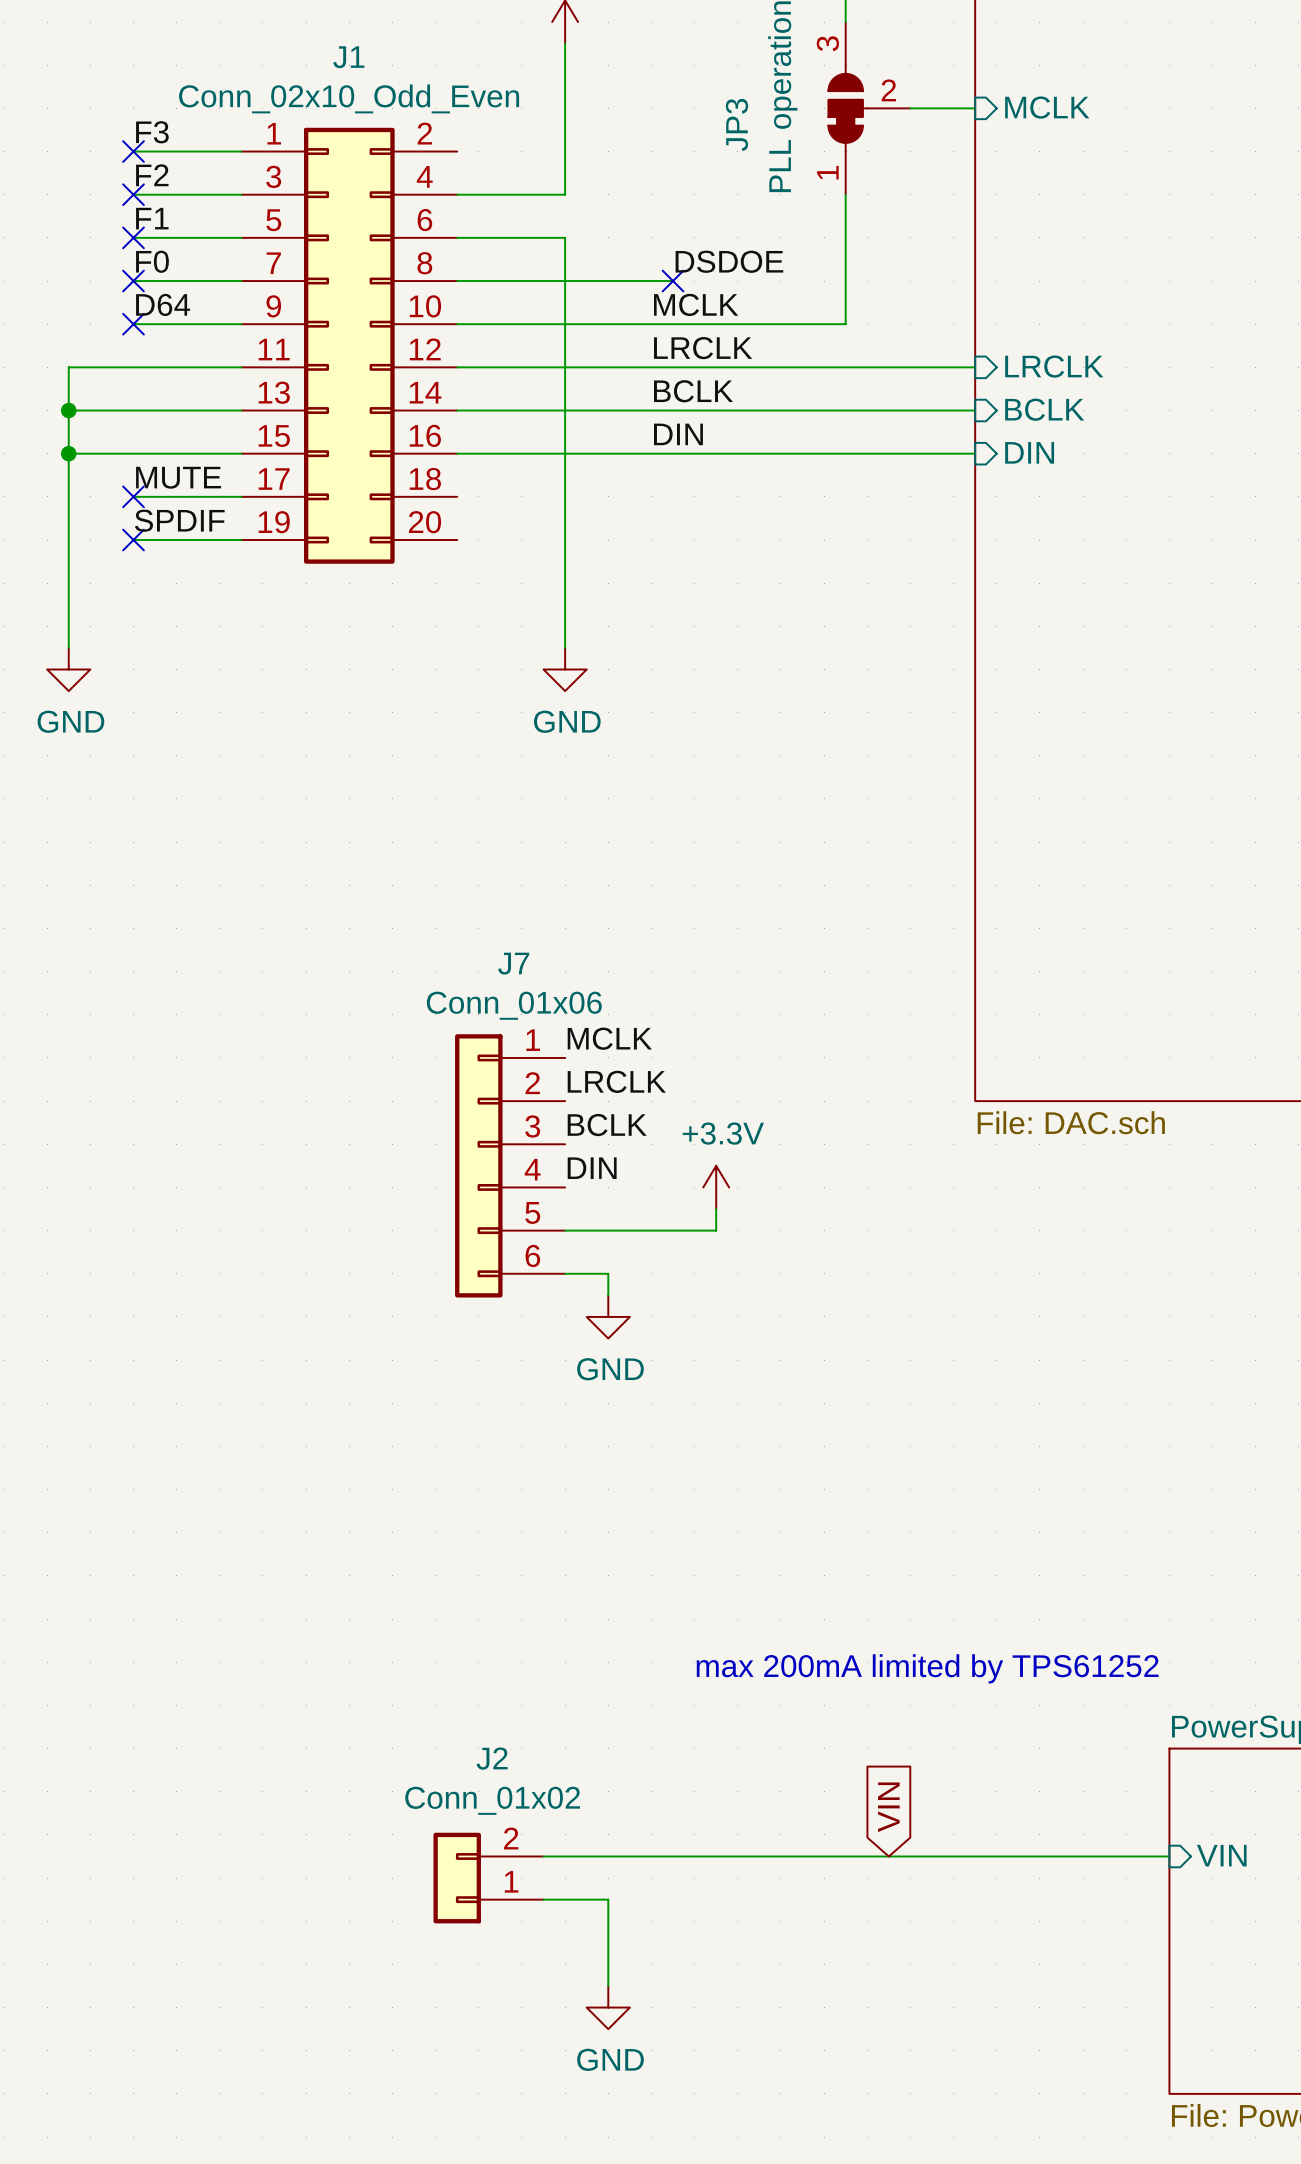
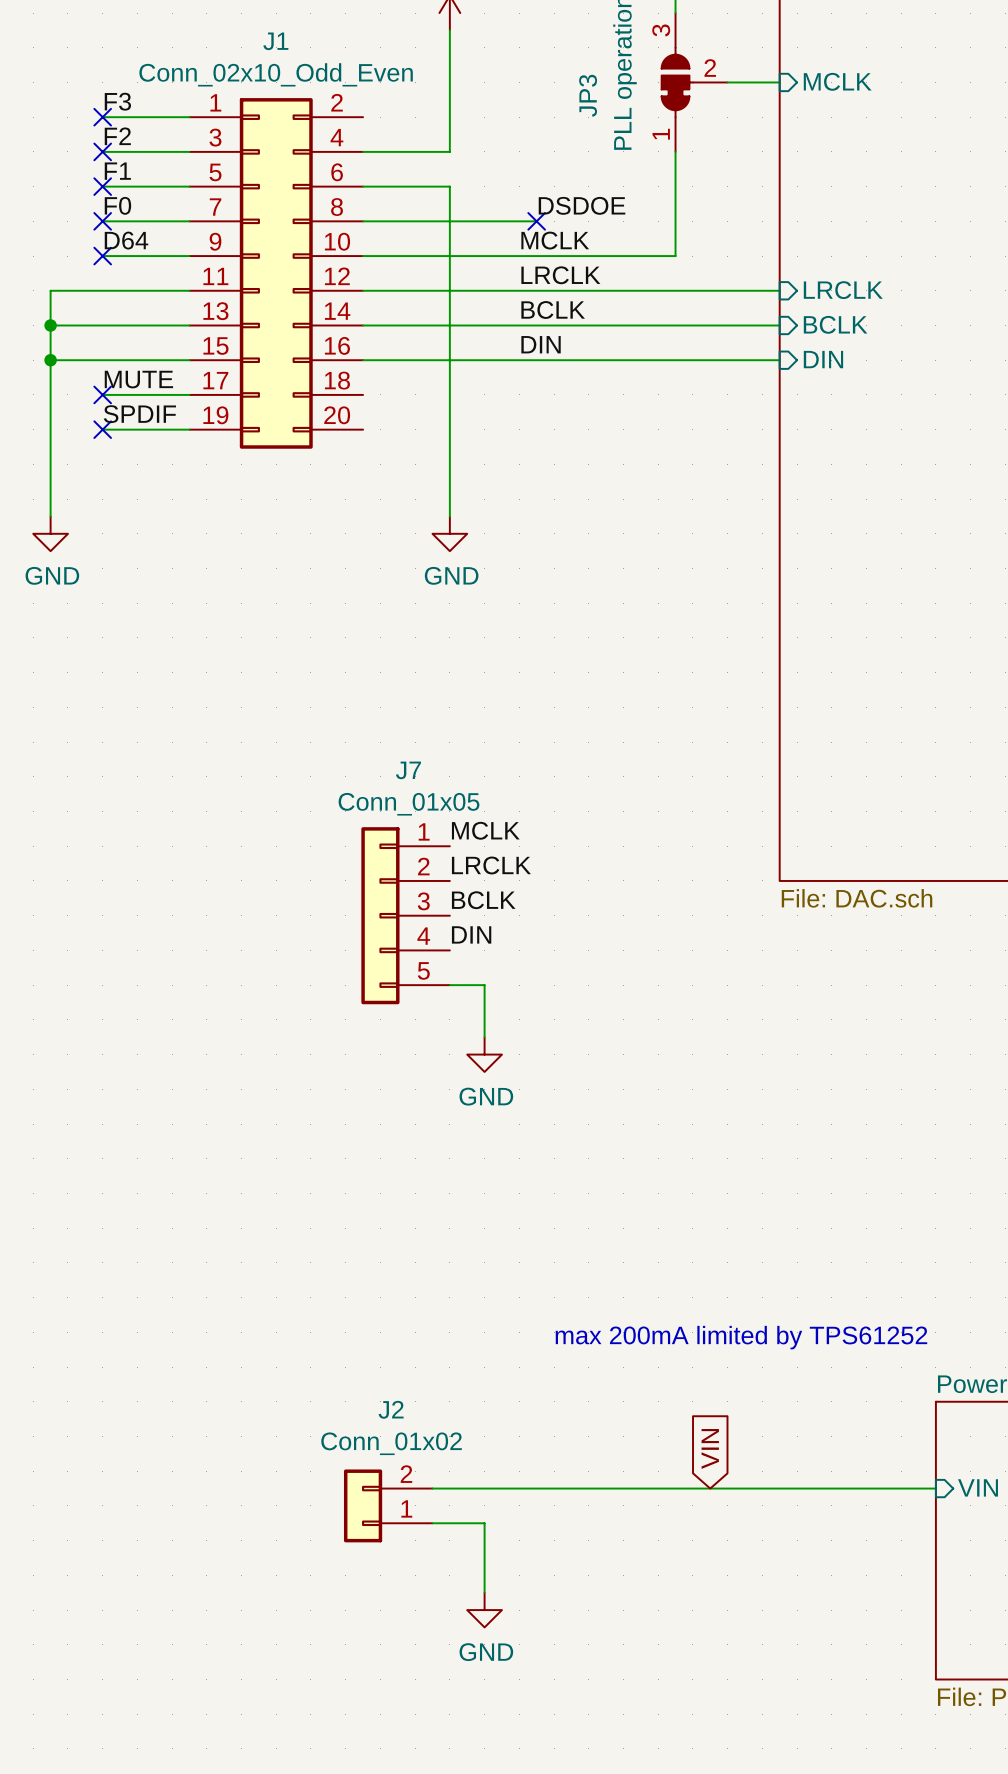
J7 value: Conn_01x06 (514, 1005) -> Conn_01x05 (409, 804)
J7 symbol: [455, 1034, 566, 1298] -> [361, 827, 450, 1005]
power symbol: +3.3V (716, 1187) -> none
wire: (716, 1209) (716, 1230) (608, 1230) -> none
wire: (565, 1273) (608, 1273) -> (484, 985) (484, 1019)

